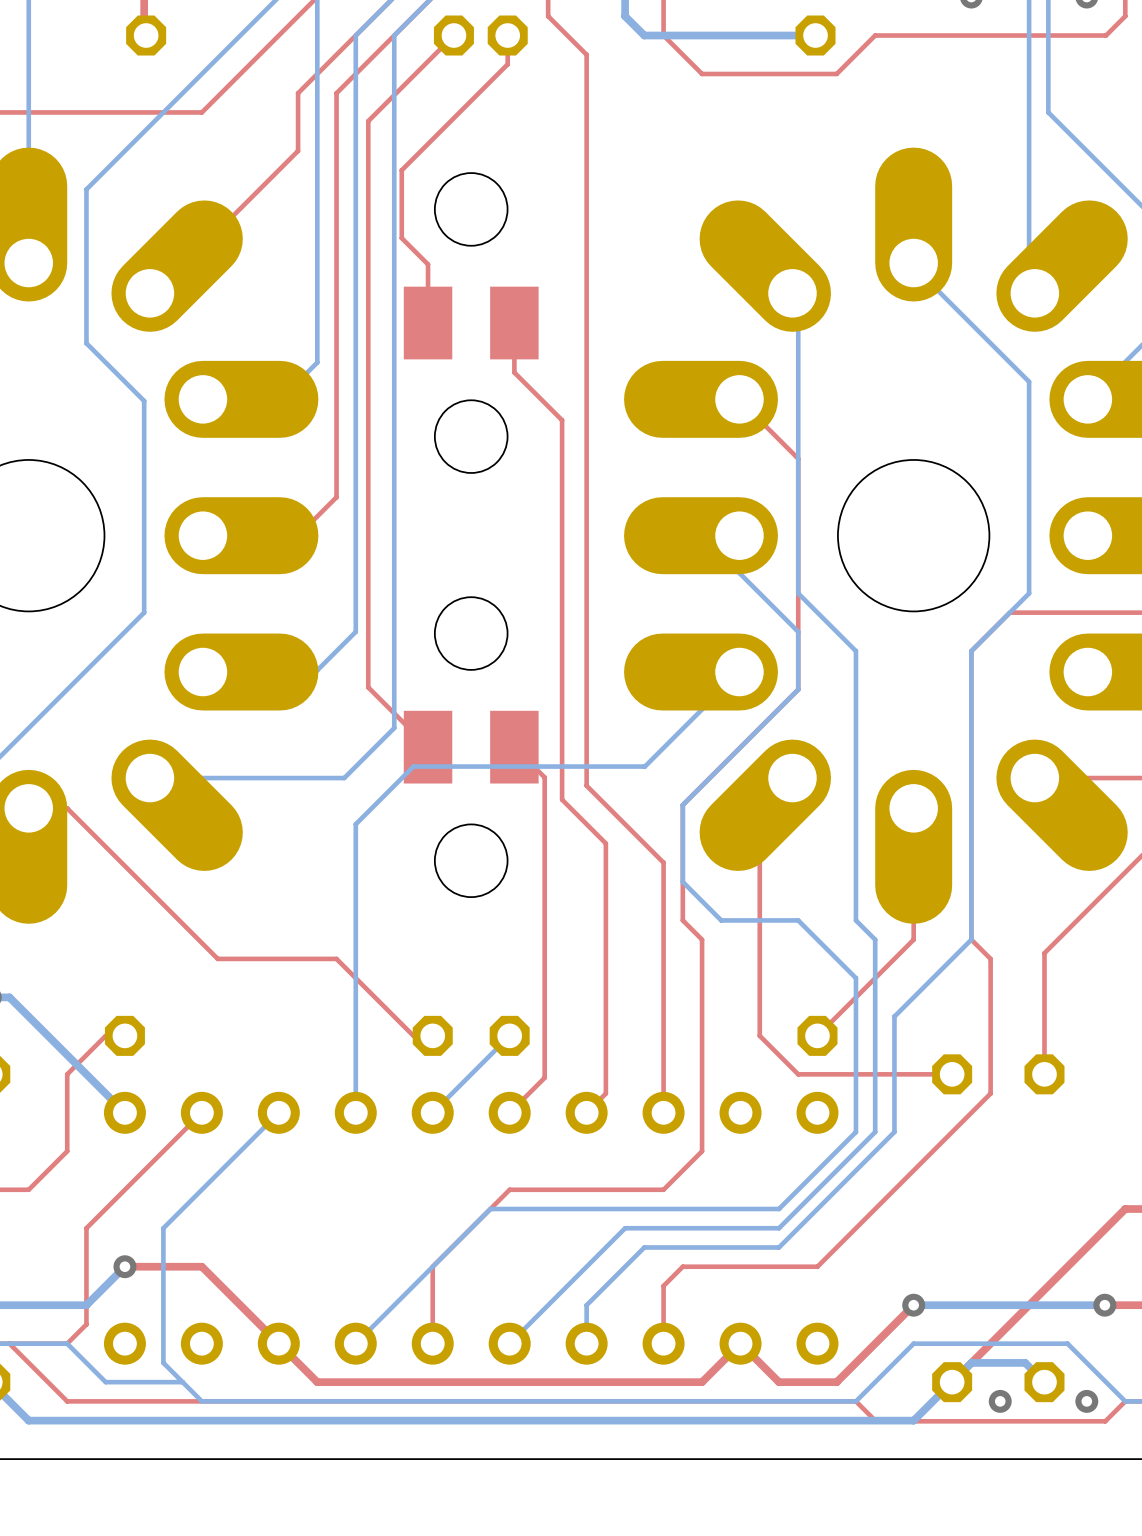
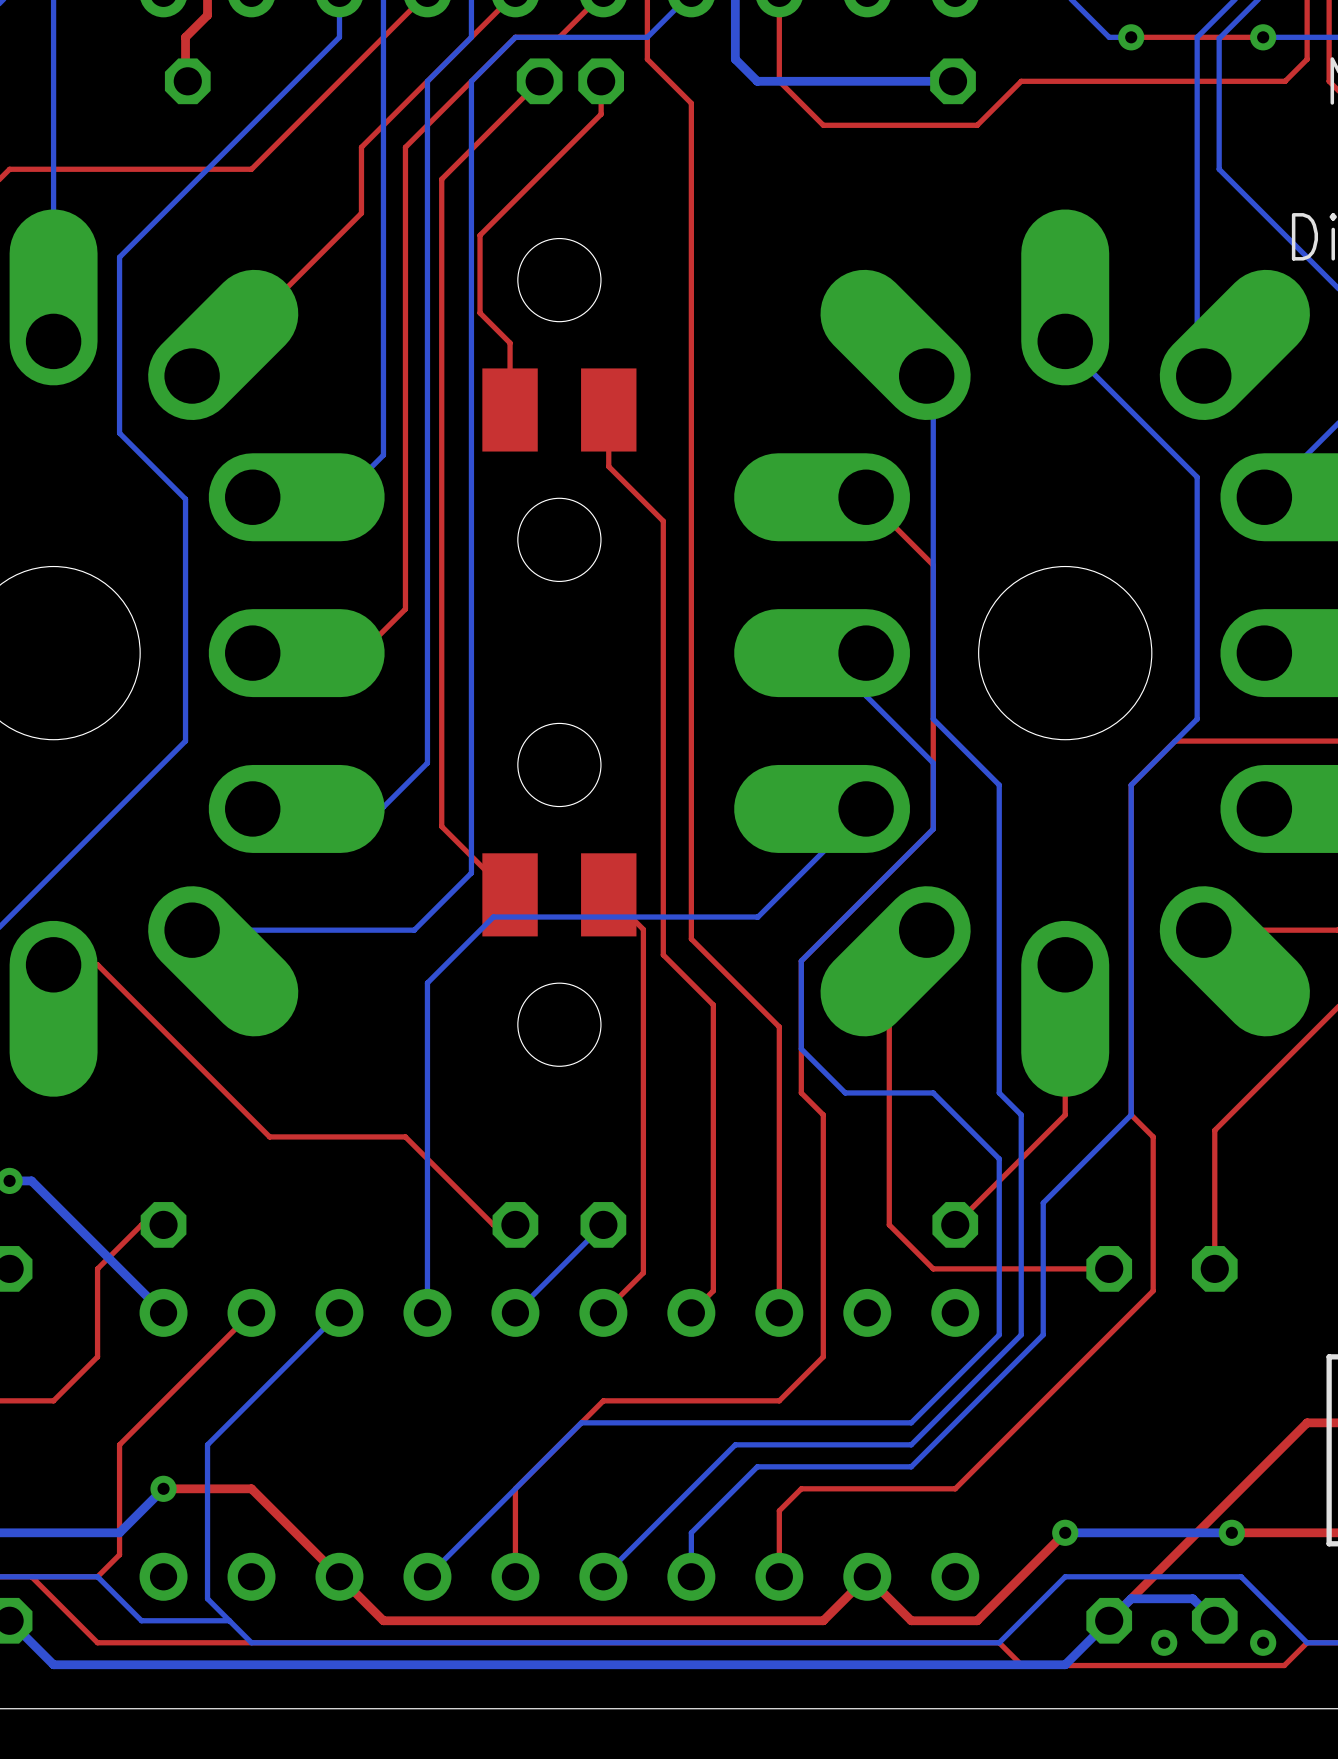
top track: none -> (1283, 1532) (1231, 1532)
via position: (1104, 1305) -> (1231, 1532)

